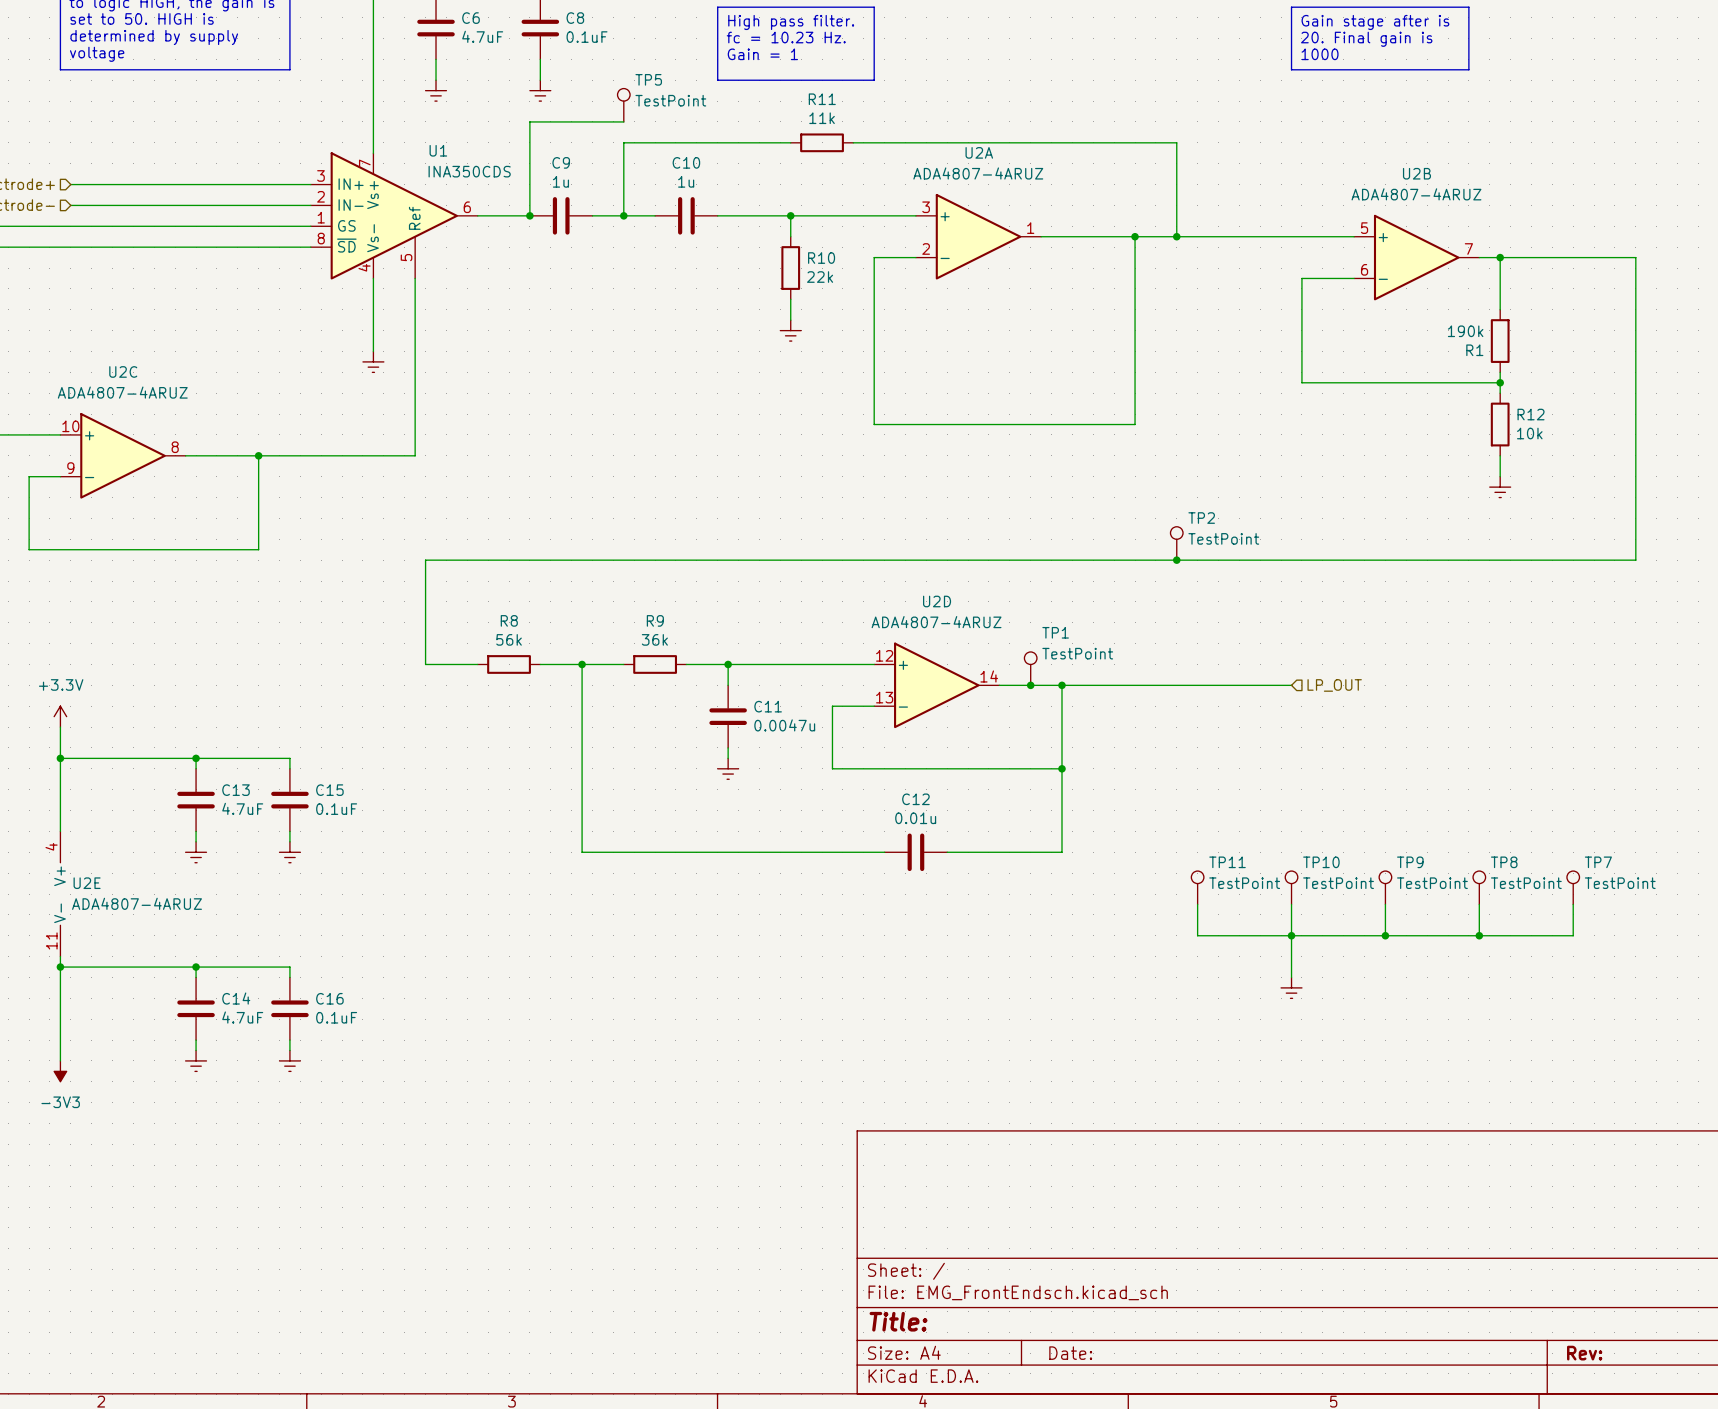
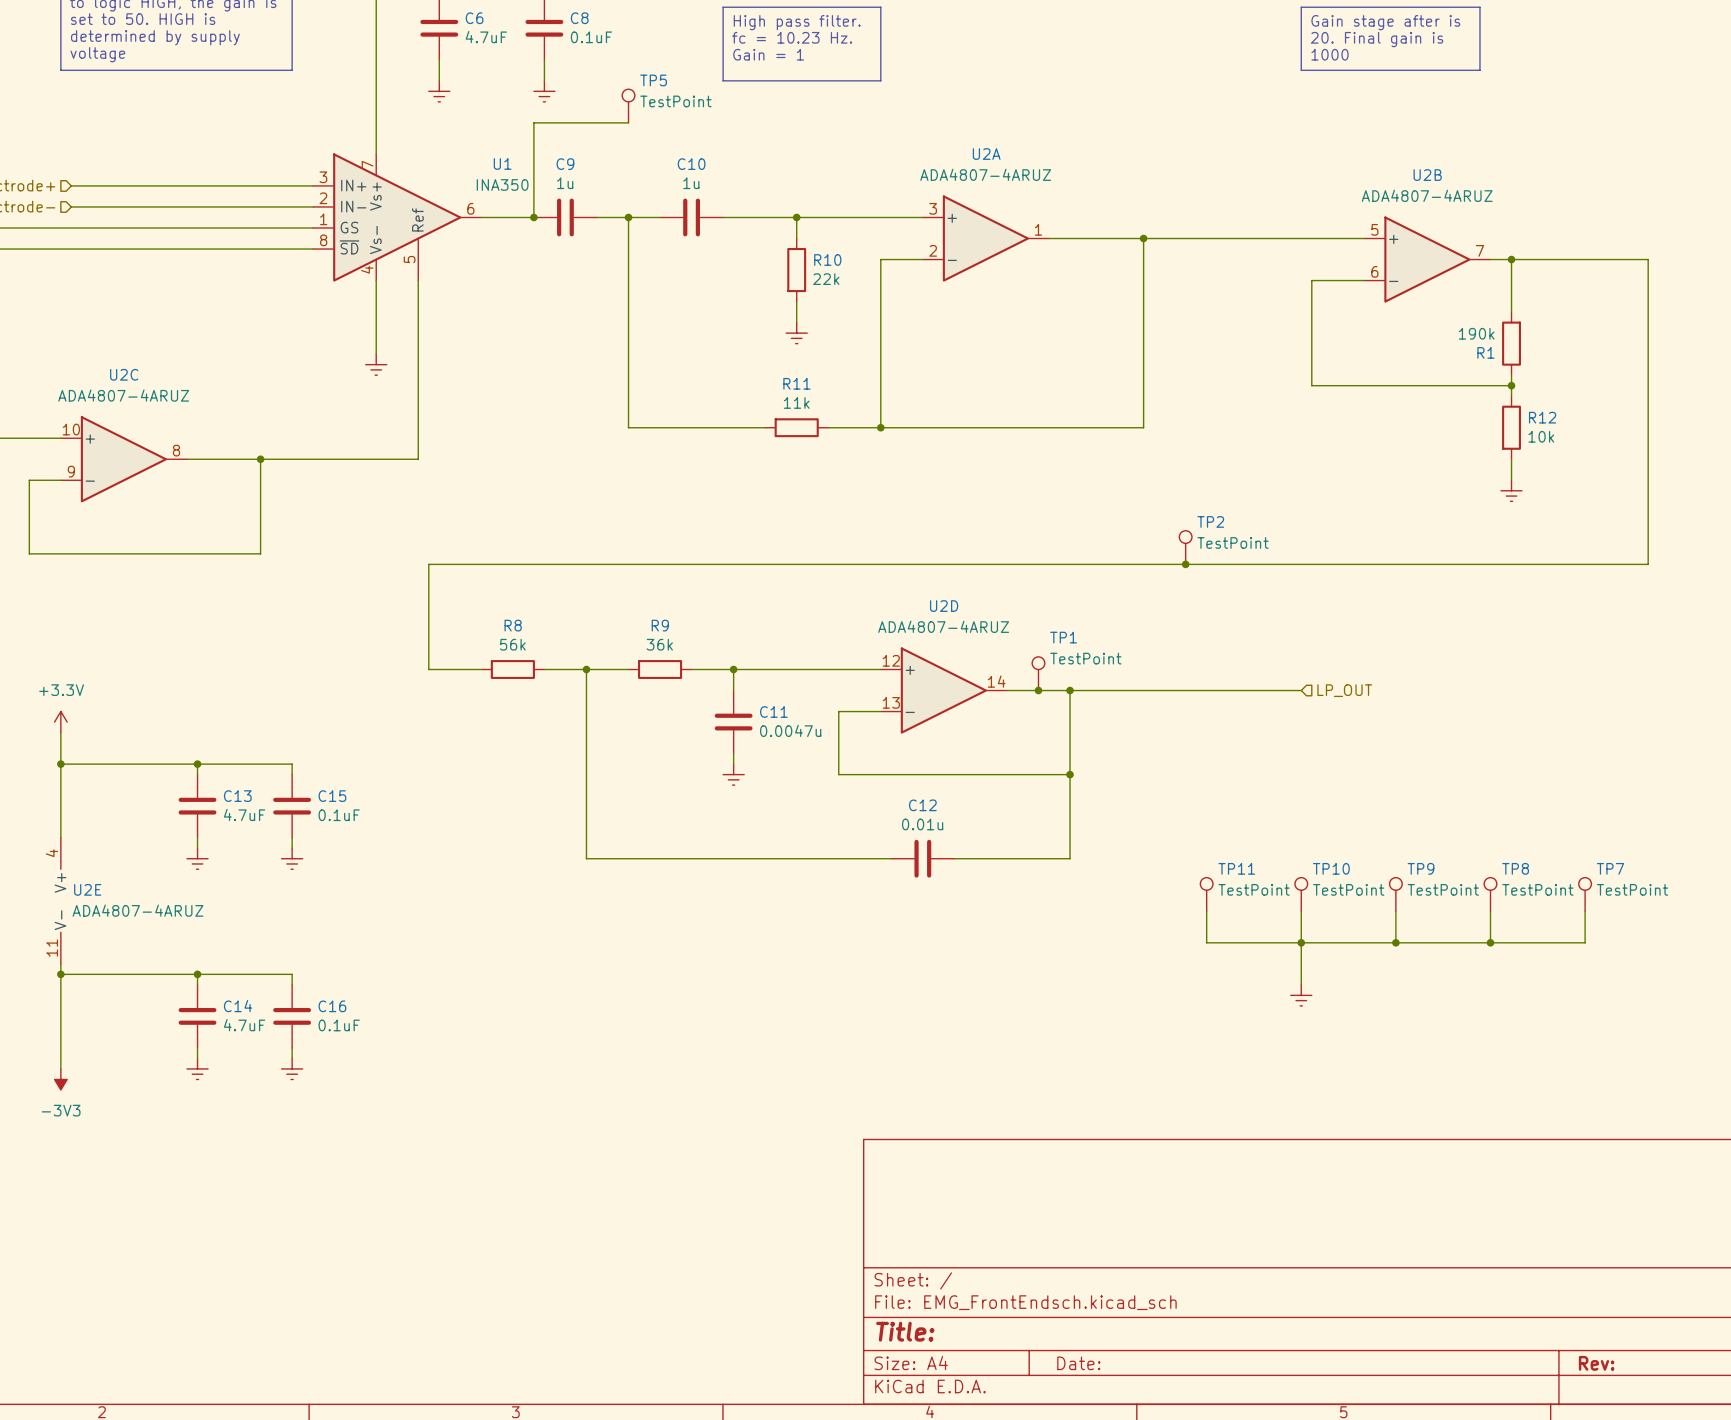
wire: (790, 142) (623, 142) (623, 215) -> (765, 427) (628, 427) (628, 217)
R11 position: (822, 142) -> (796, 427)
wire: (853, 142) (1176, 142) (1176, 236) -> none
U1 name position: U1 (438, 150) -> U1 (502, 163)
U1 value: INA350CDS (469, 171) -> INA350 (502, 184)
junction: (1176, 236) -> none
wire: none -> (828, 427) (880, 427)
junction: none -> (880, 427)

